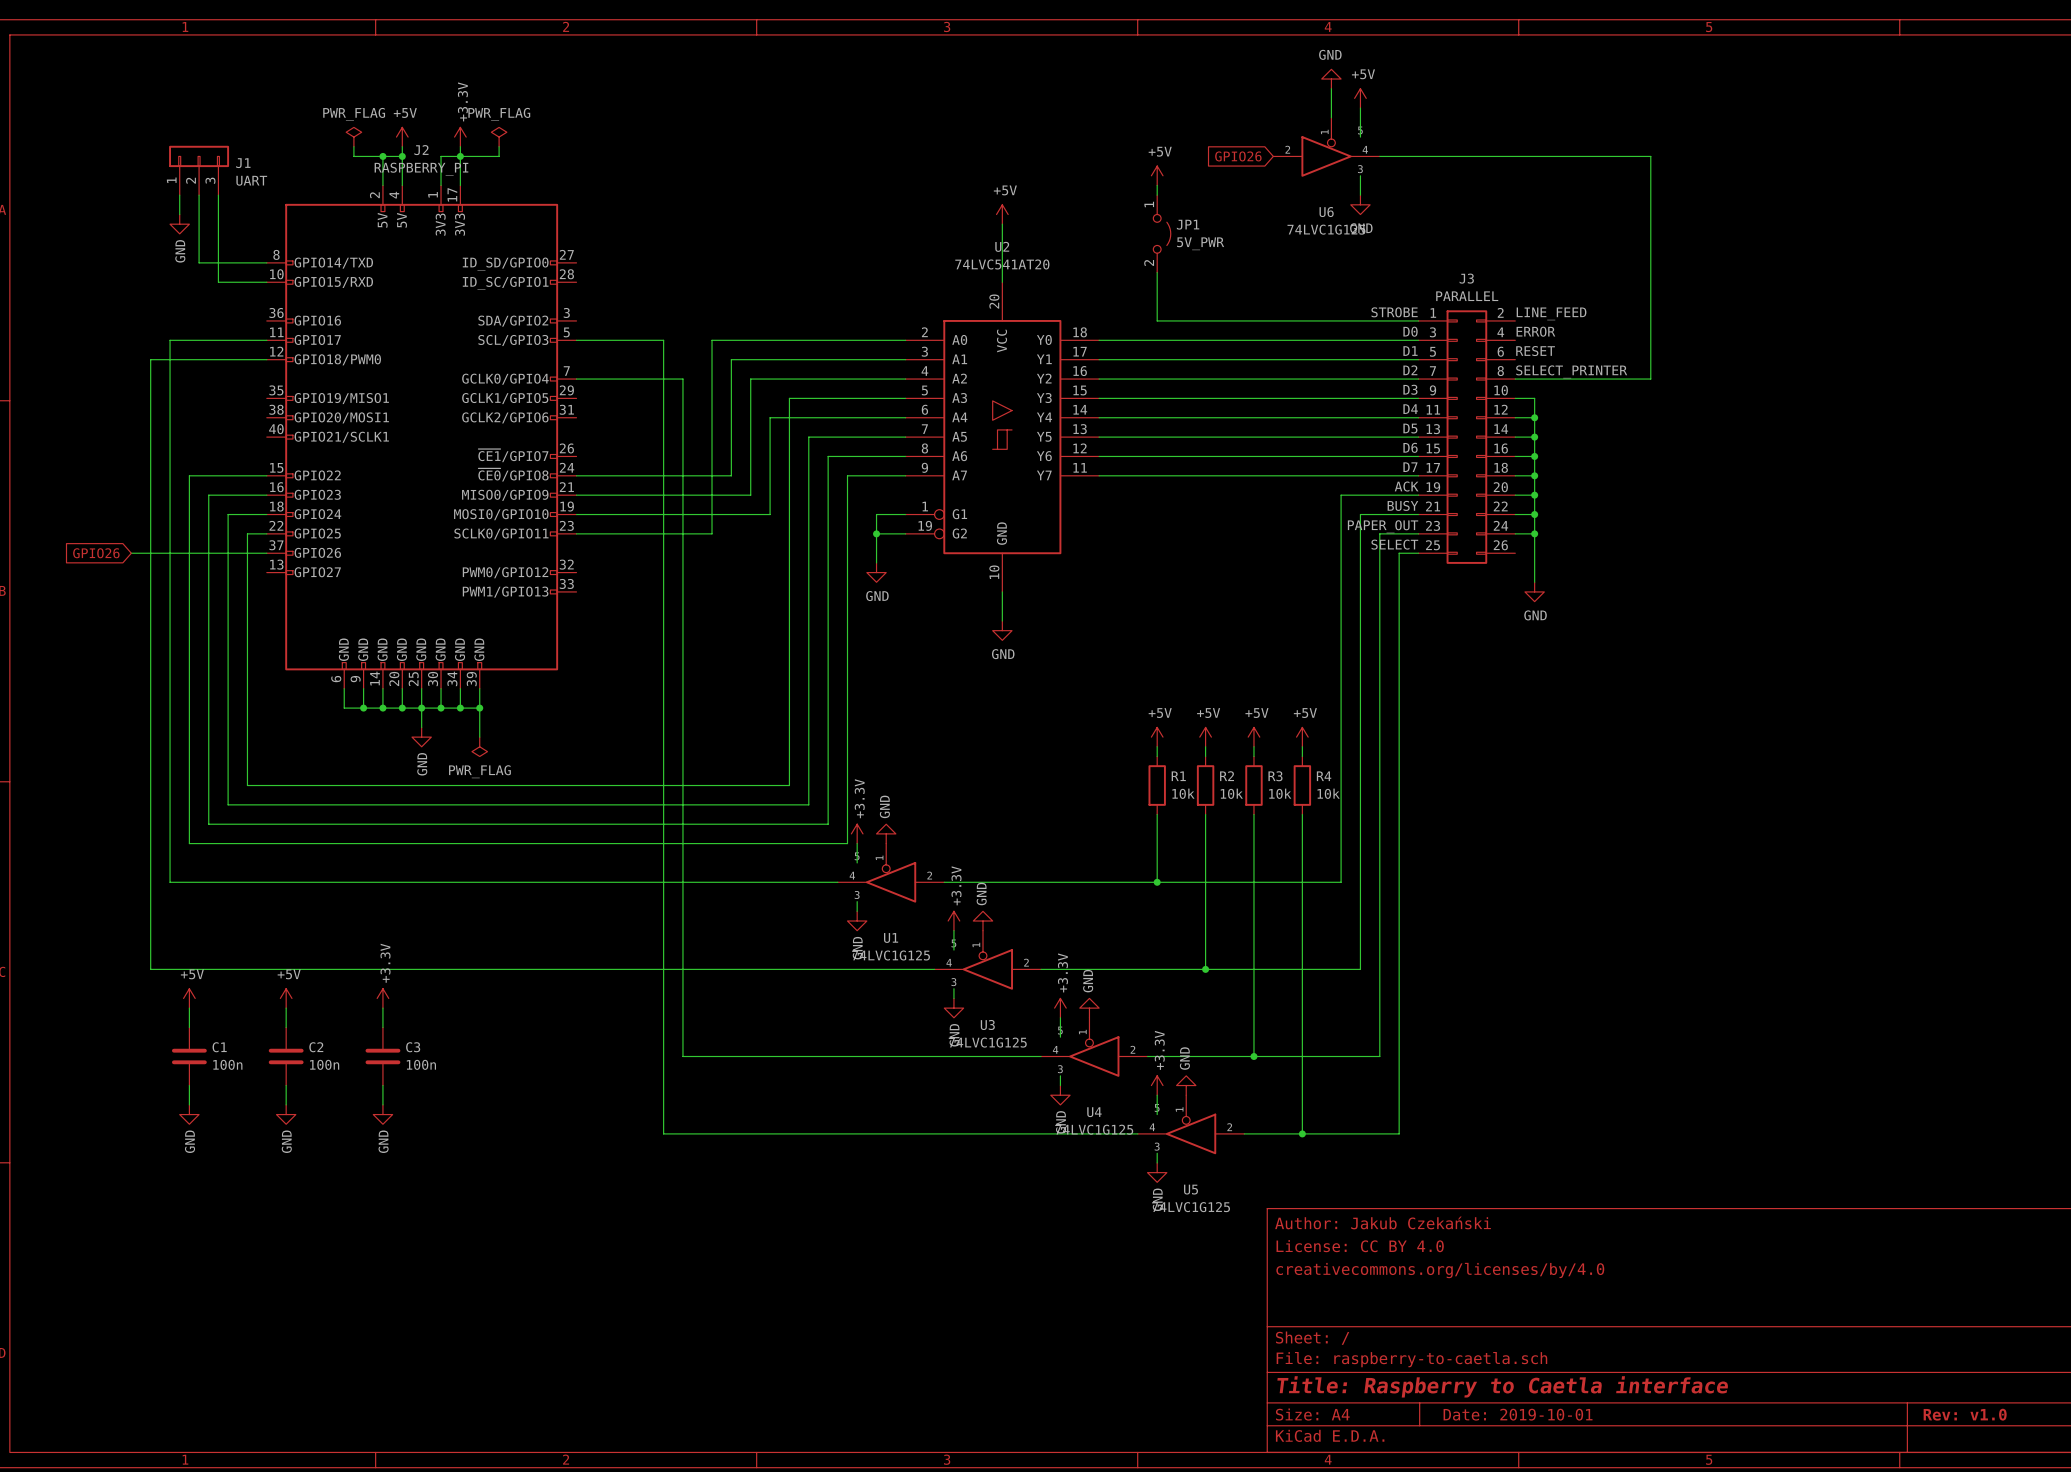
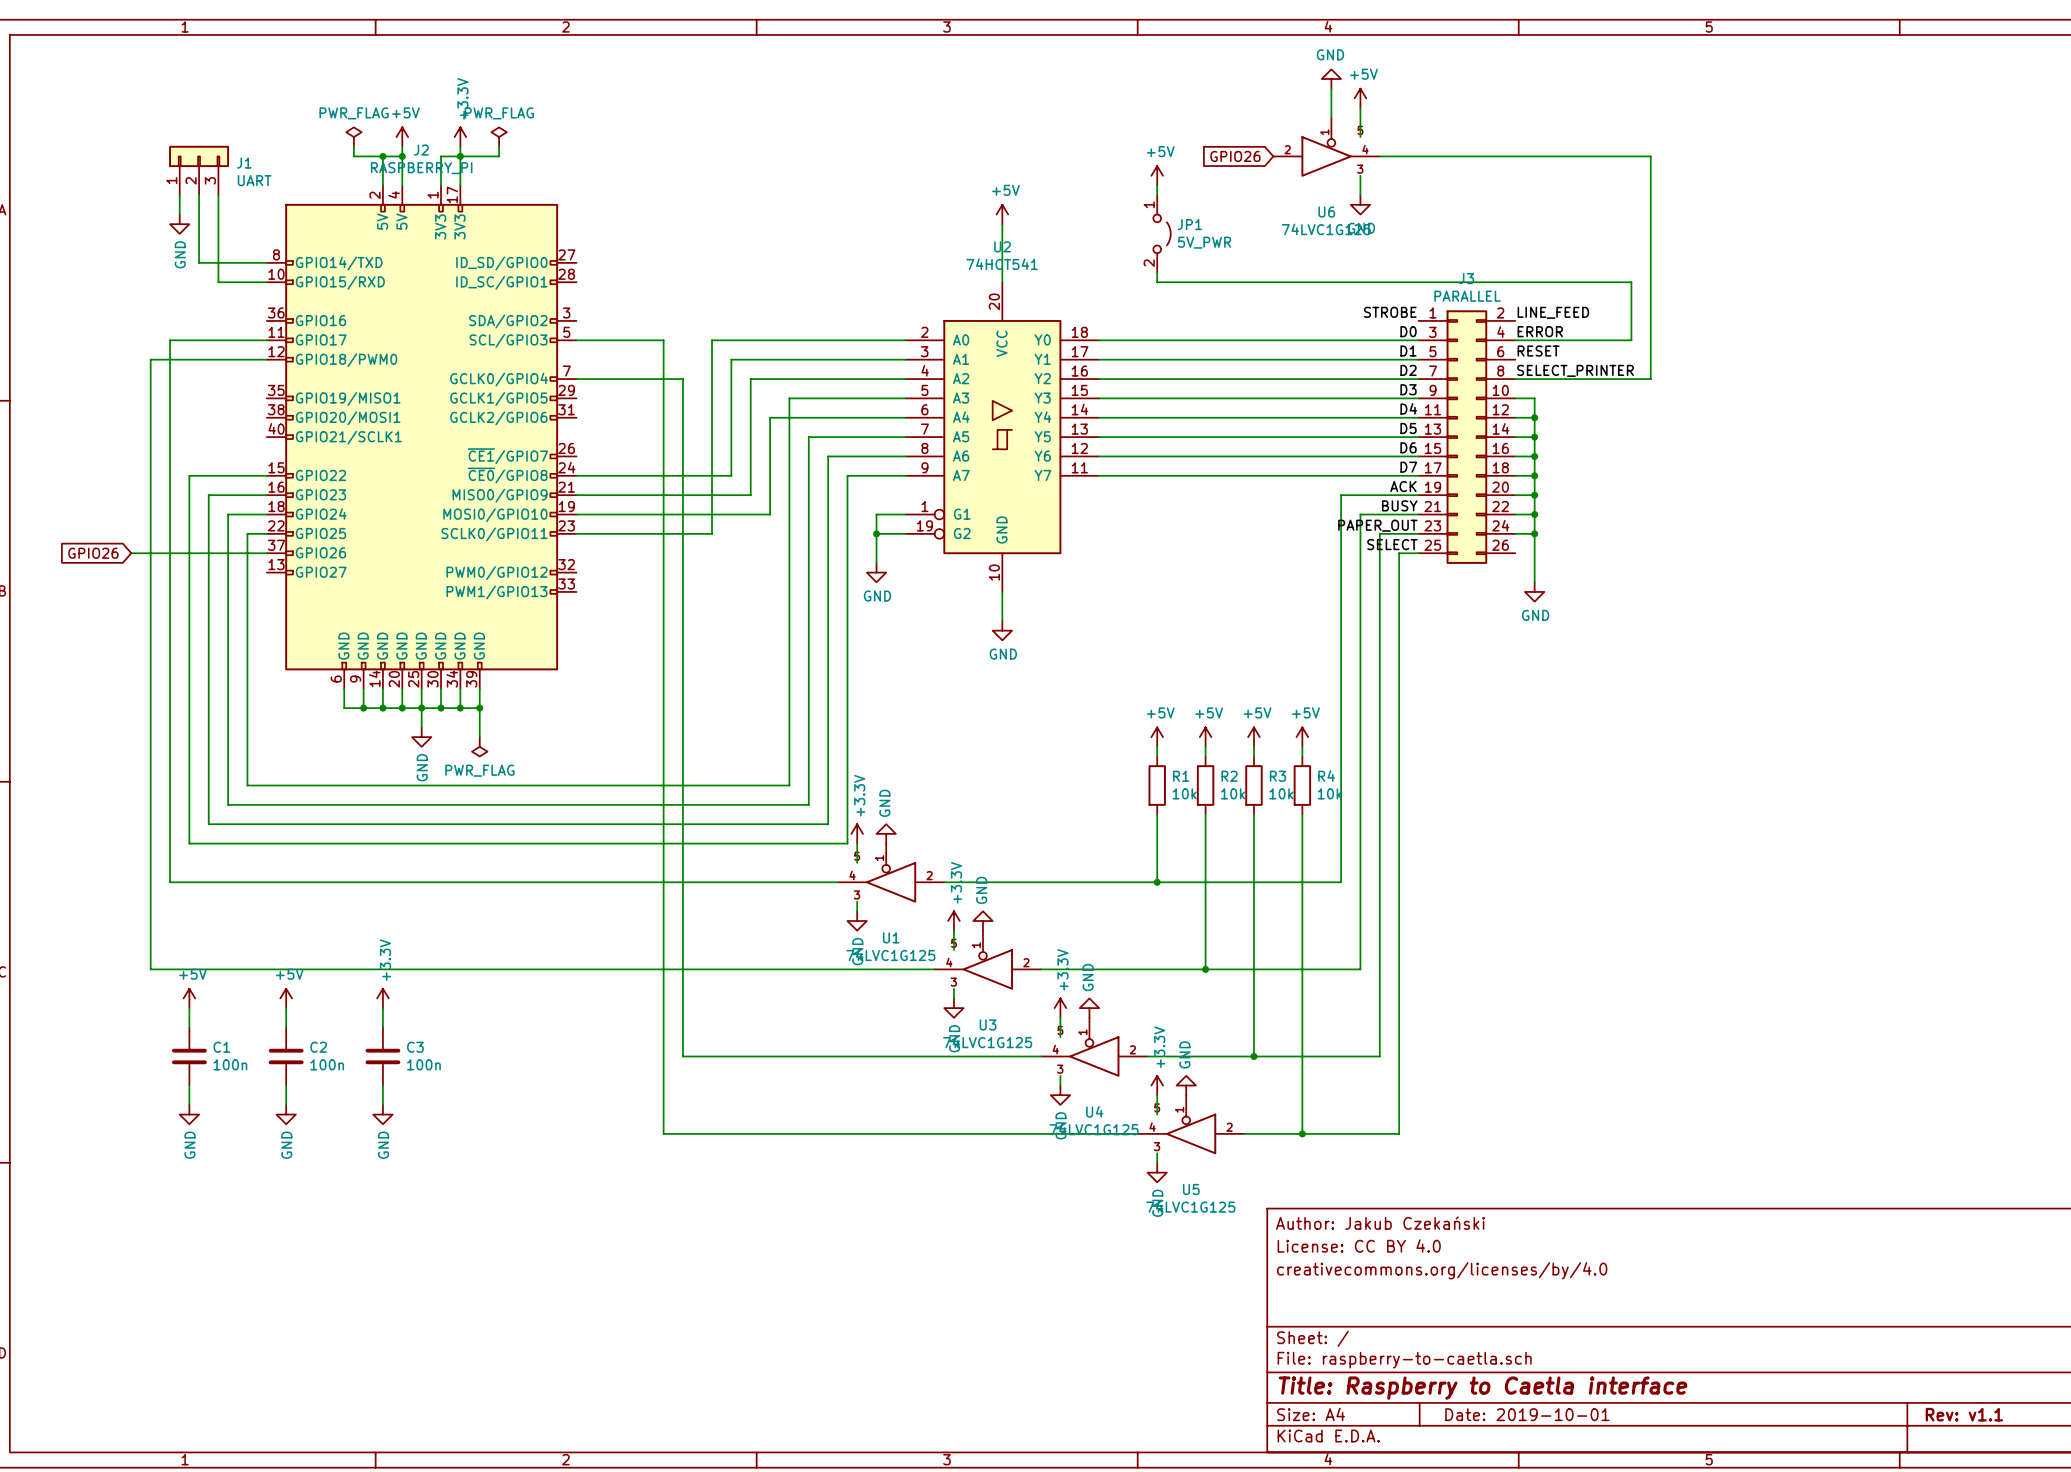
U2 value: 74LVC541AT20 (1002, 264) -> 74HCT541 (1002, 264)
wire: (1157, 282) (1157, 320) (1418, 320) -> (1157, 282) (1631, 282) (1631, 340) (1515, 340)
title block: Rev: v1.0 (1965, 1414) -> Rev: v1.1 (1964, 1414)

